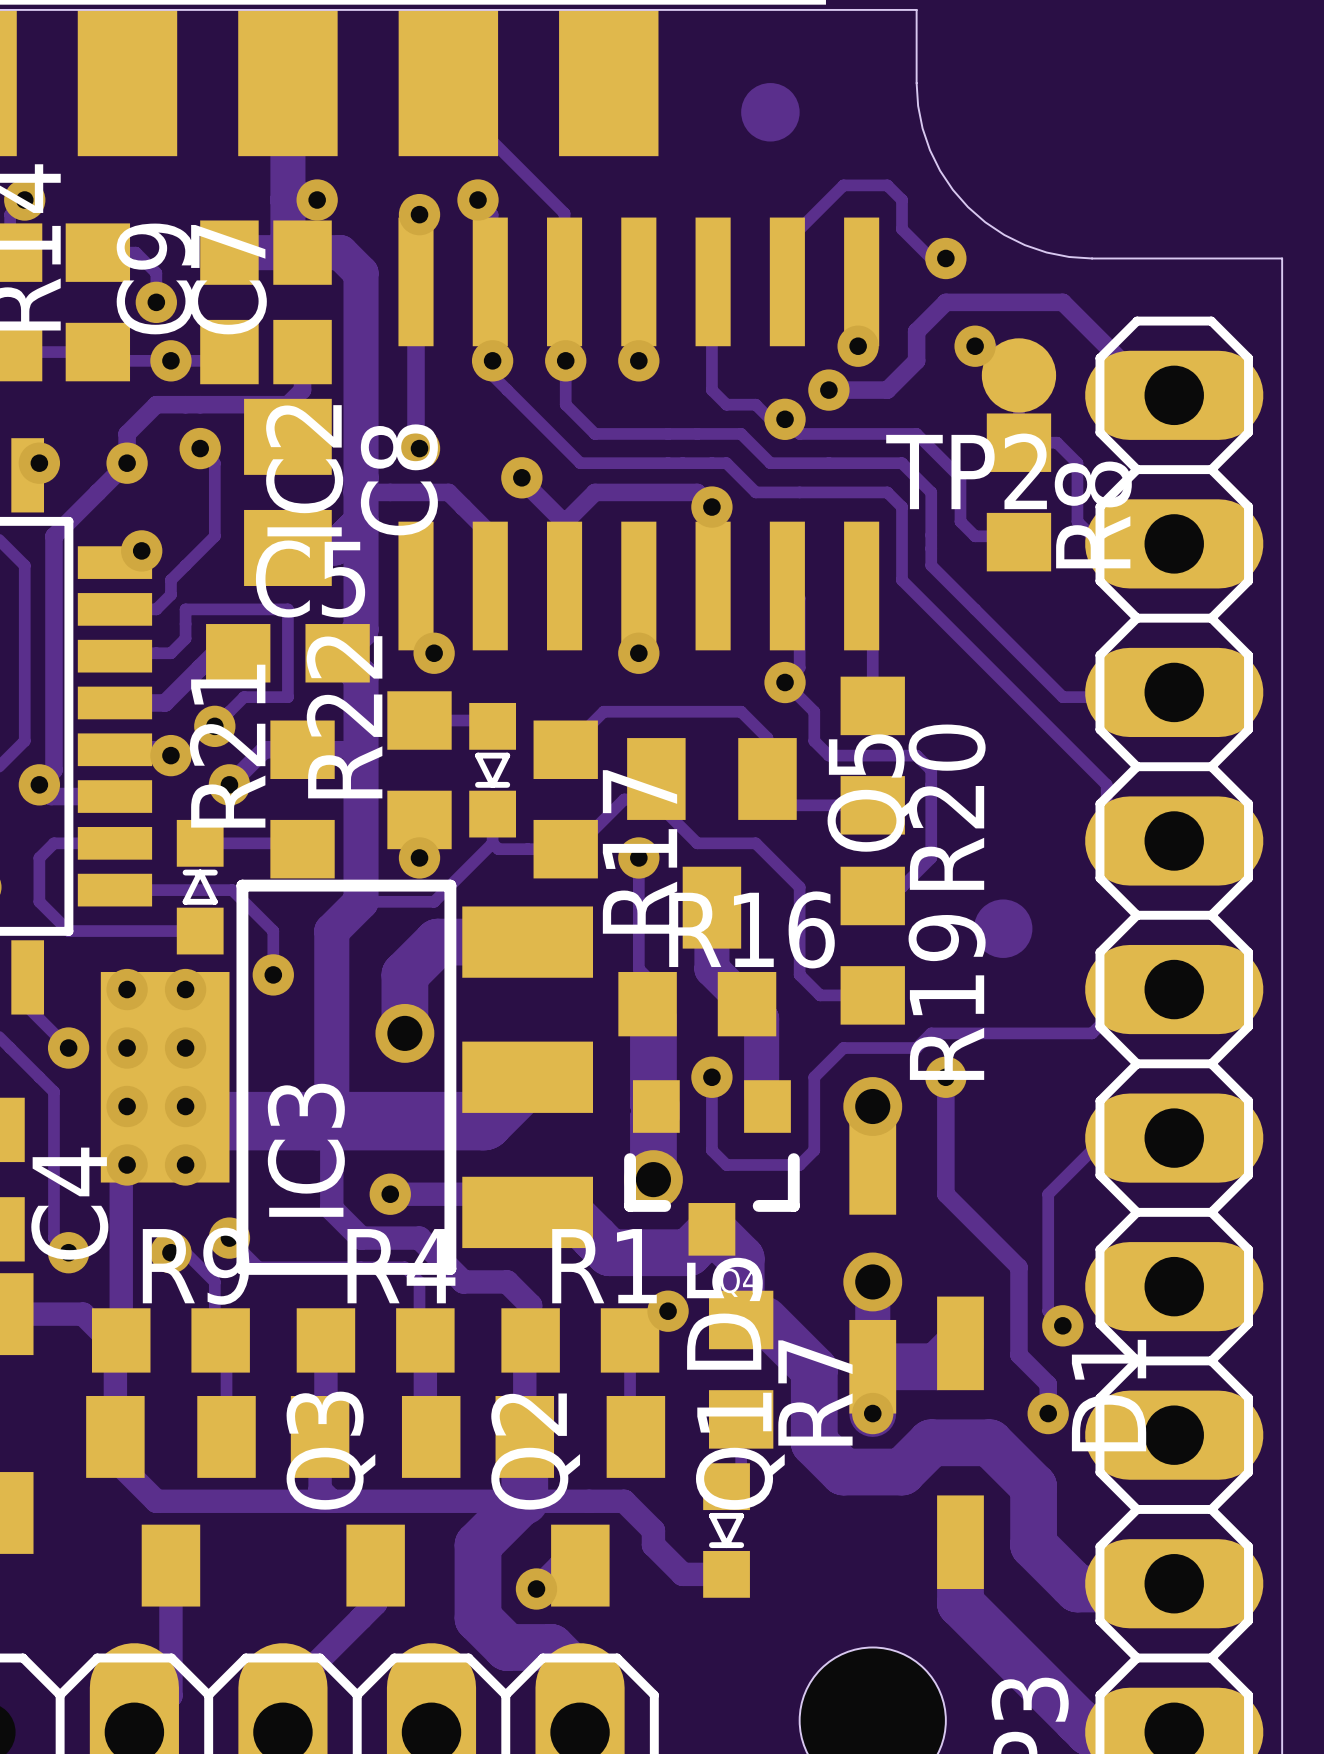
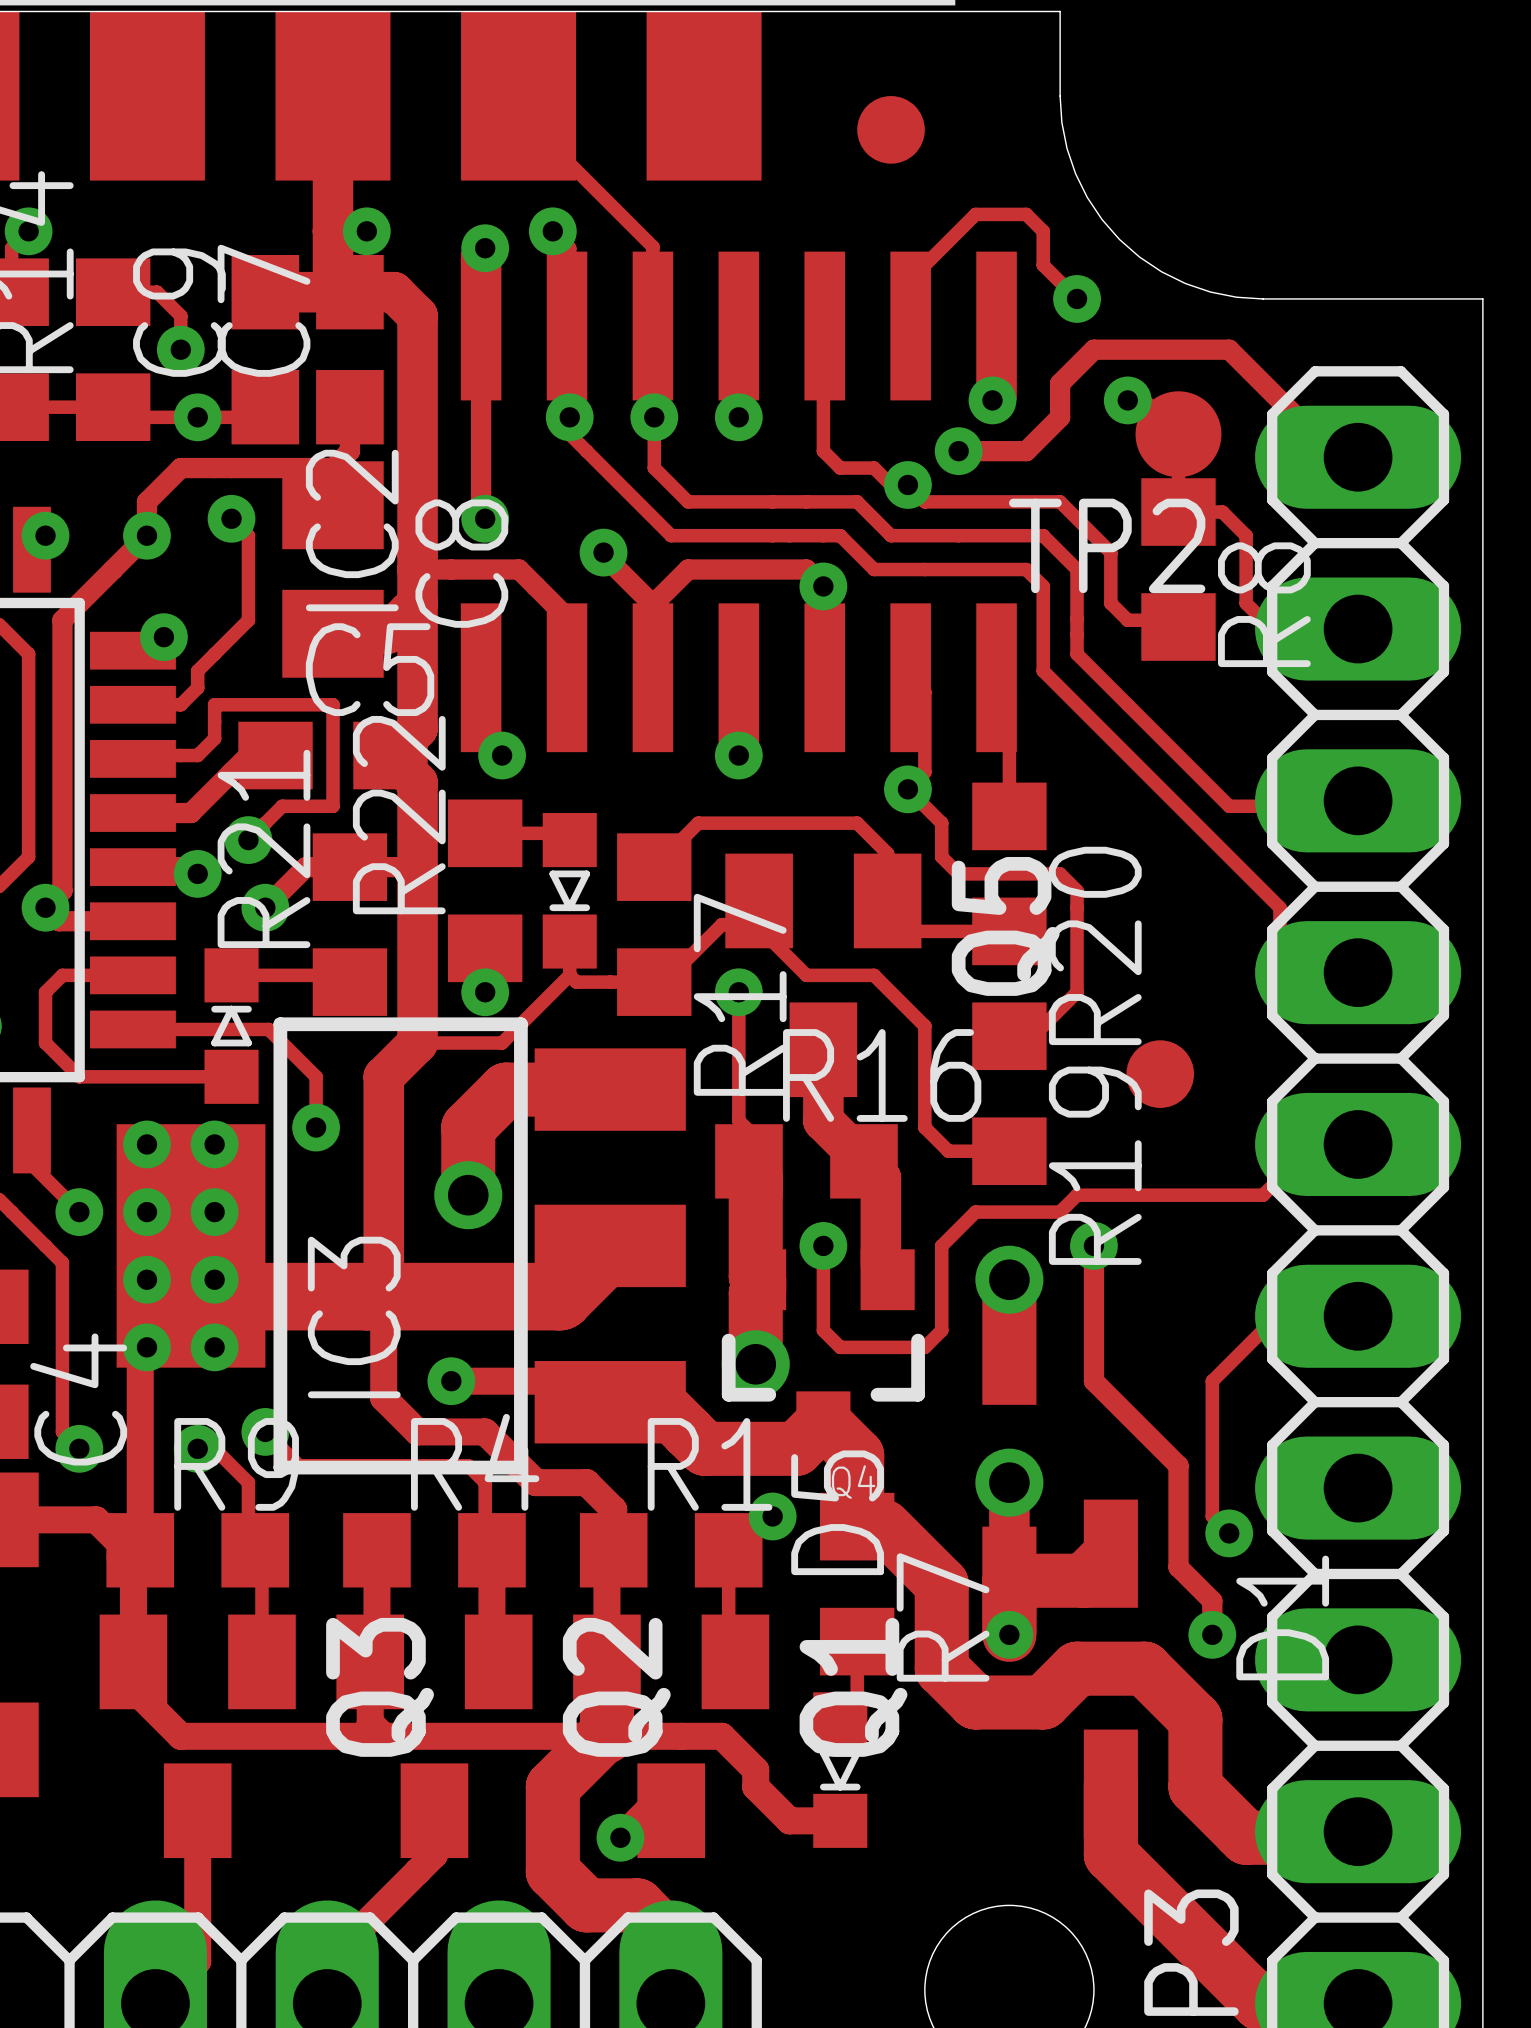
via position: (945, 258) -> (1077, 298)

